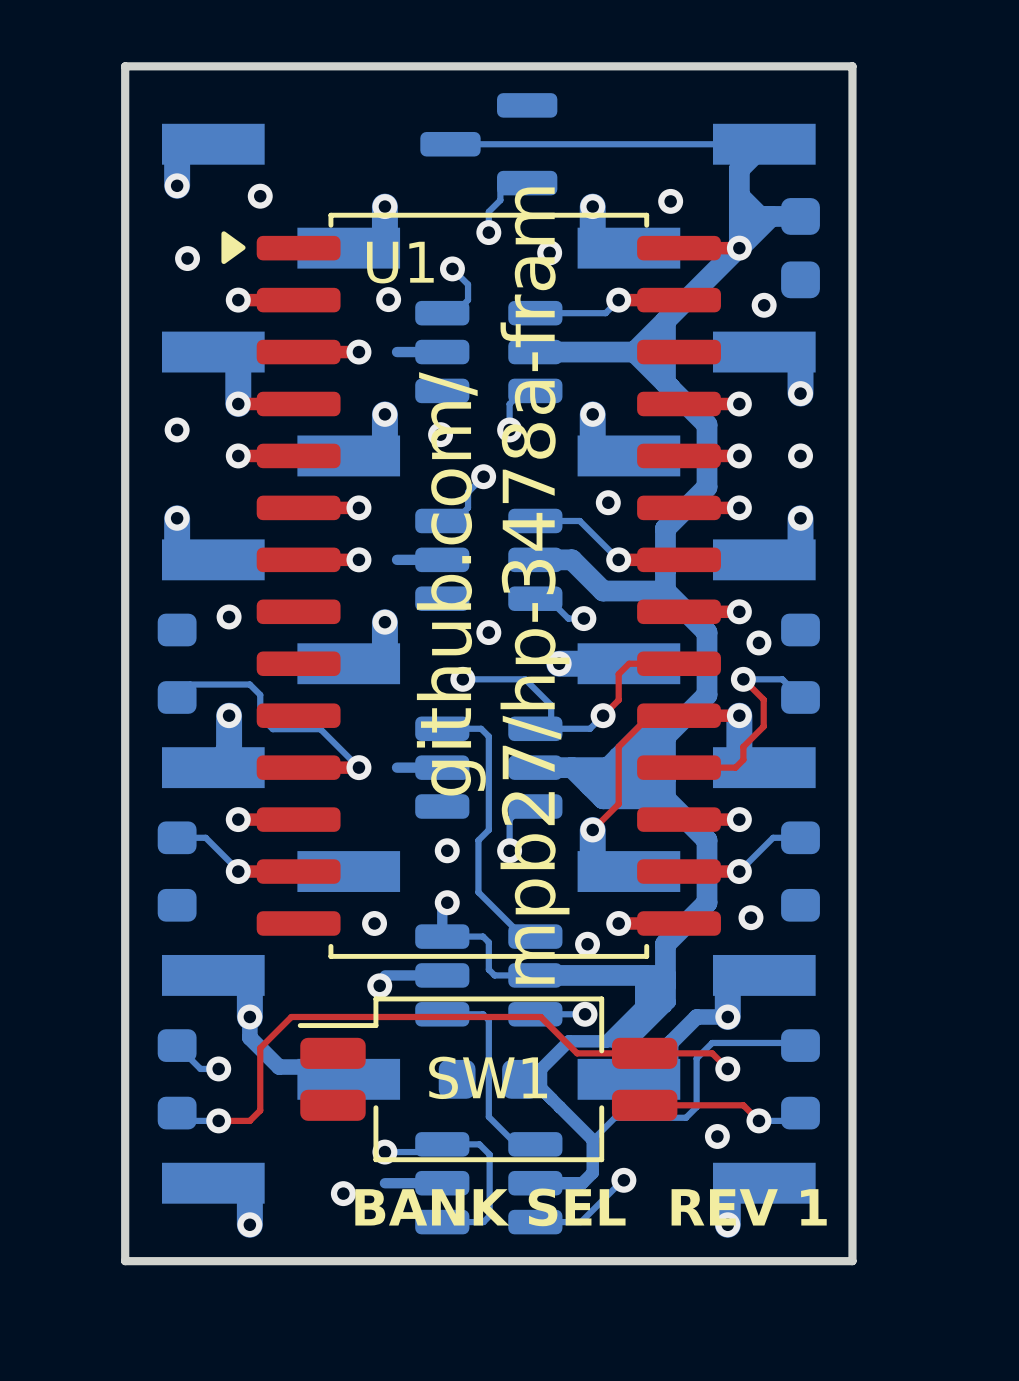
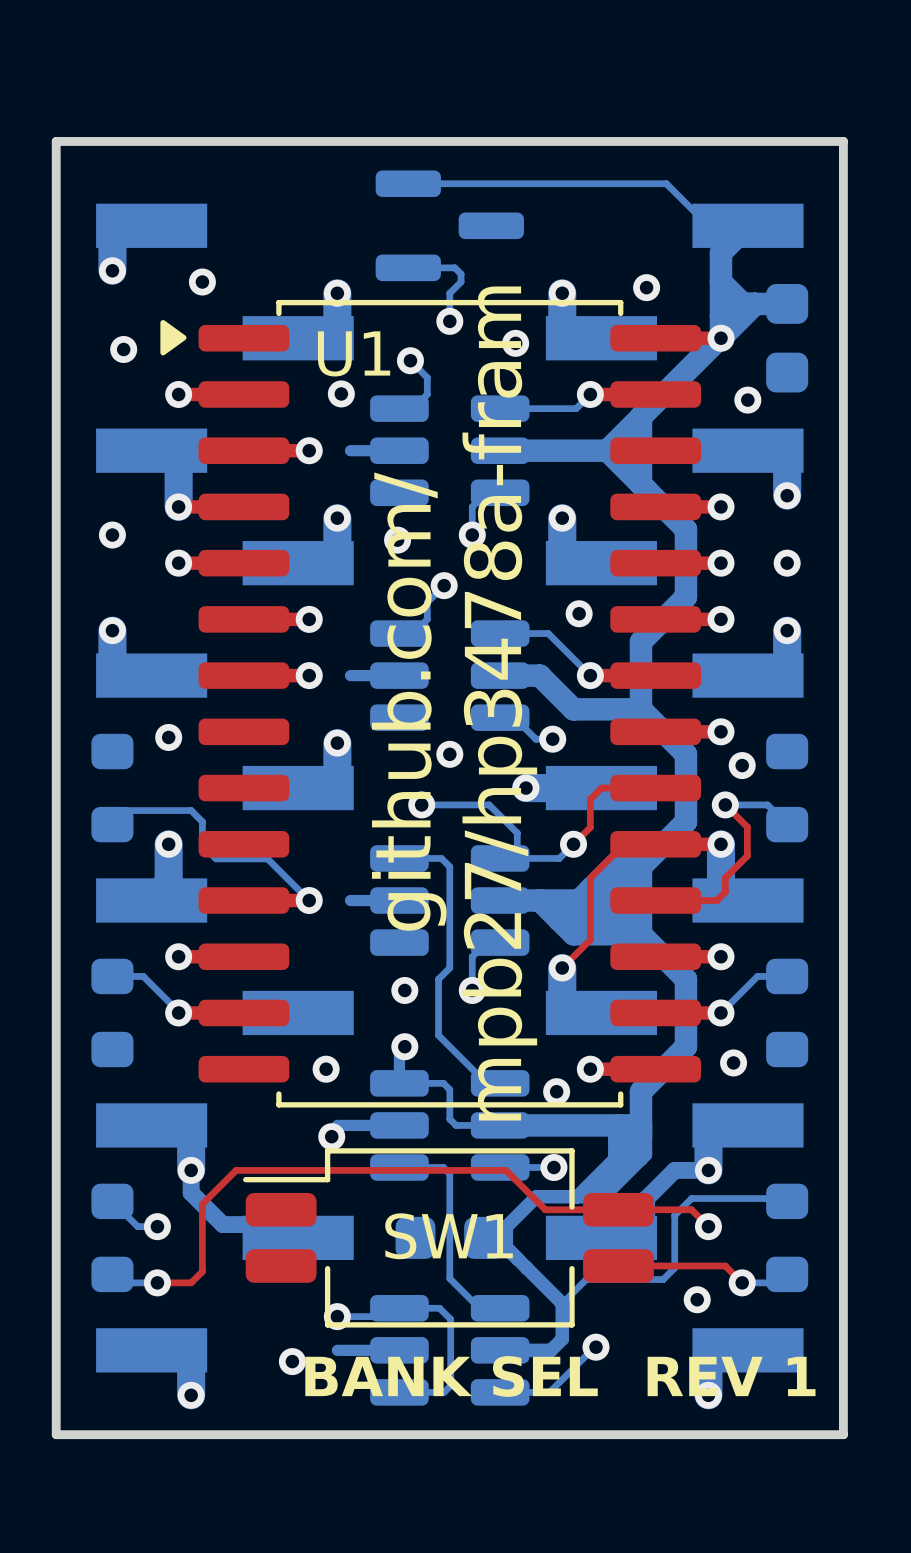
bottom track: (450, 144) (727, 144) -> (408, 183) (666, 183) (708, 225)
part rotation: 0° (488, 144) -> 180° (449, 225)
bottom track: (500, 189) (500, 200) (488, 211) -> (408, 267) (454, 267) (461, 274) (461, 282) (449, 293) (449, 298)
text: mpb27/hp-3478a-fram (535, 585) -> mpb27/hp3478a-fram (499, 703)

